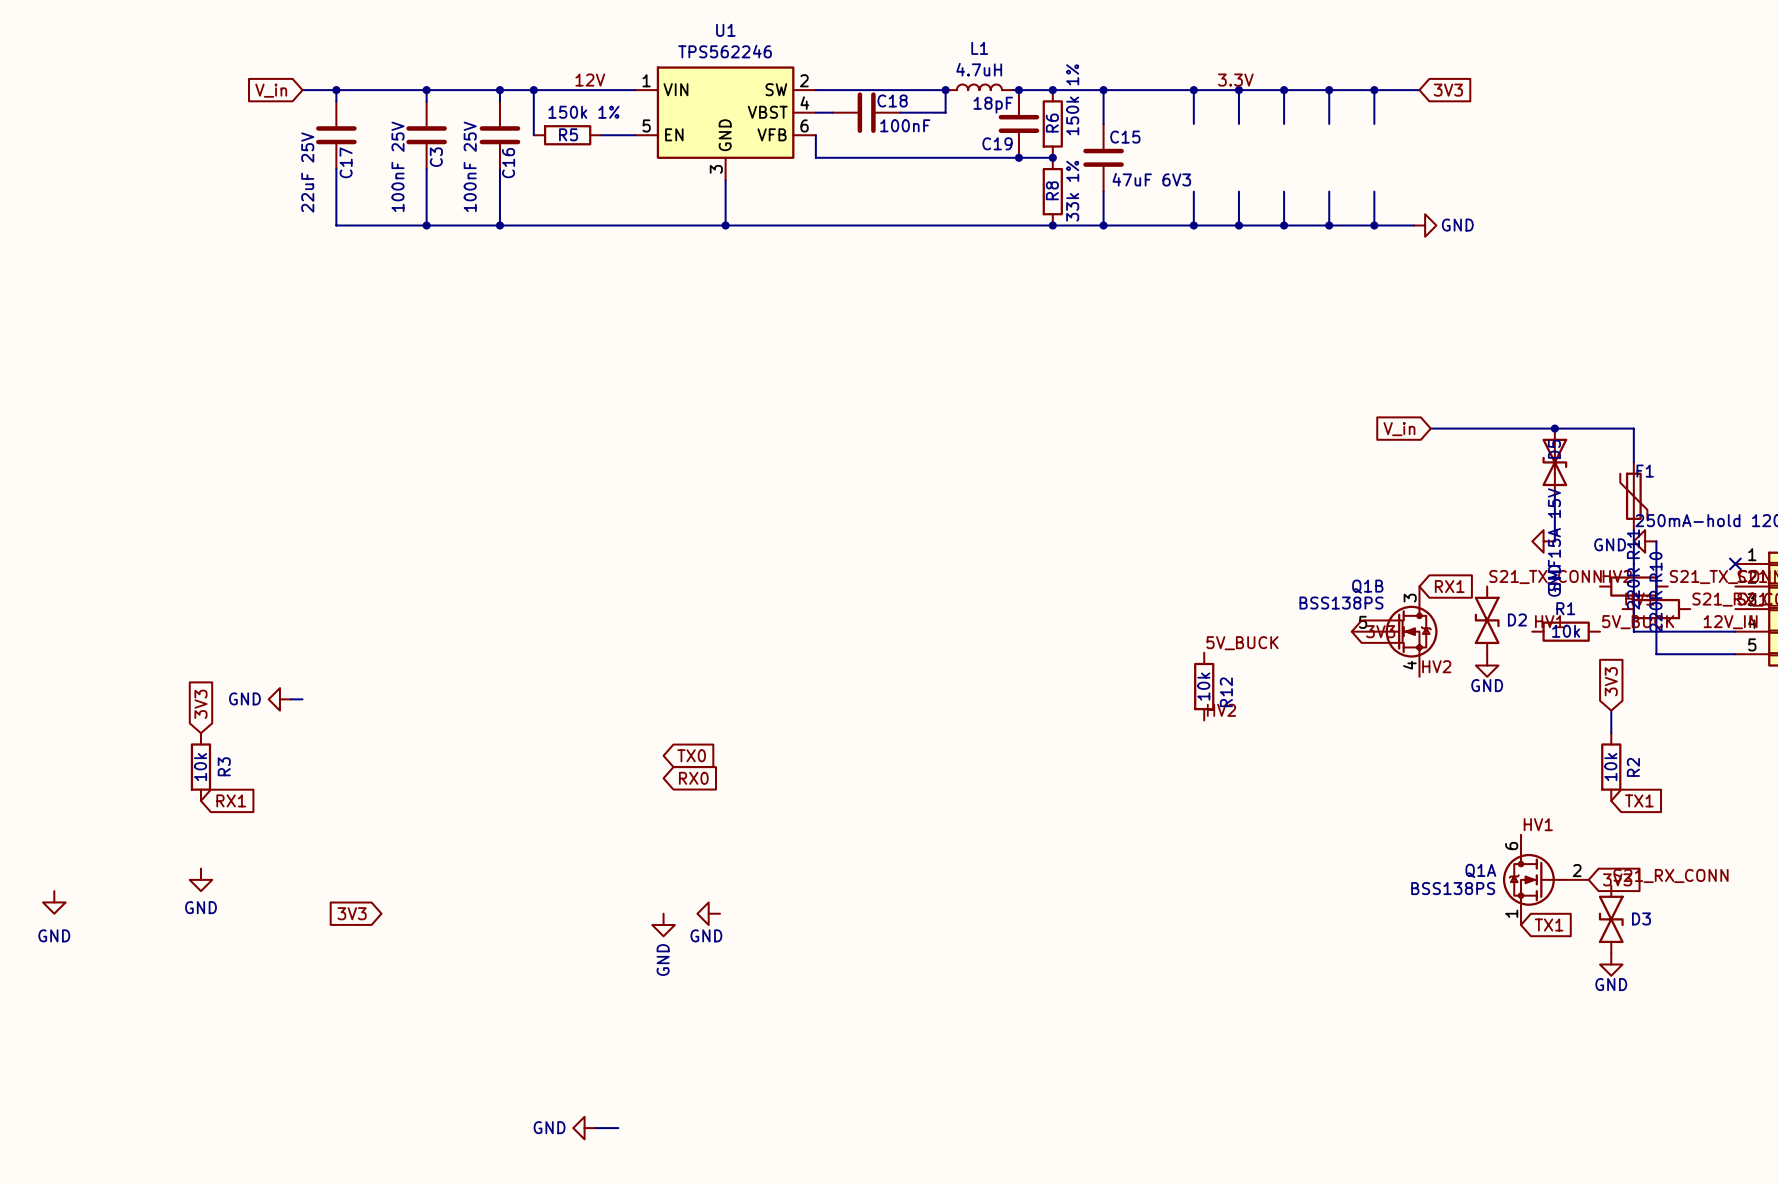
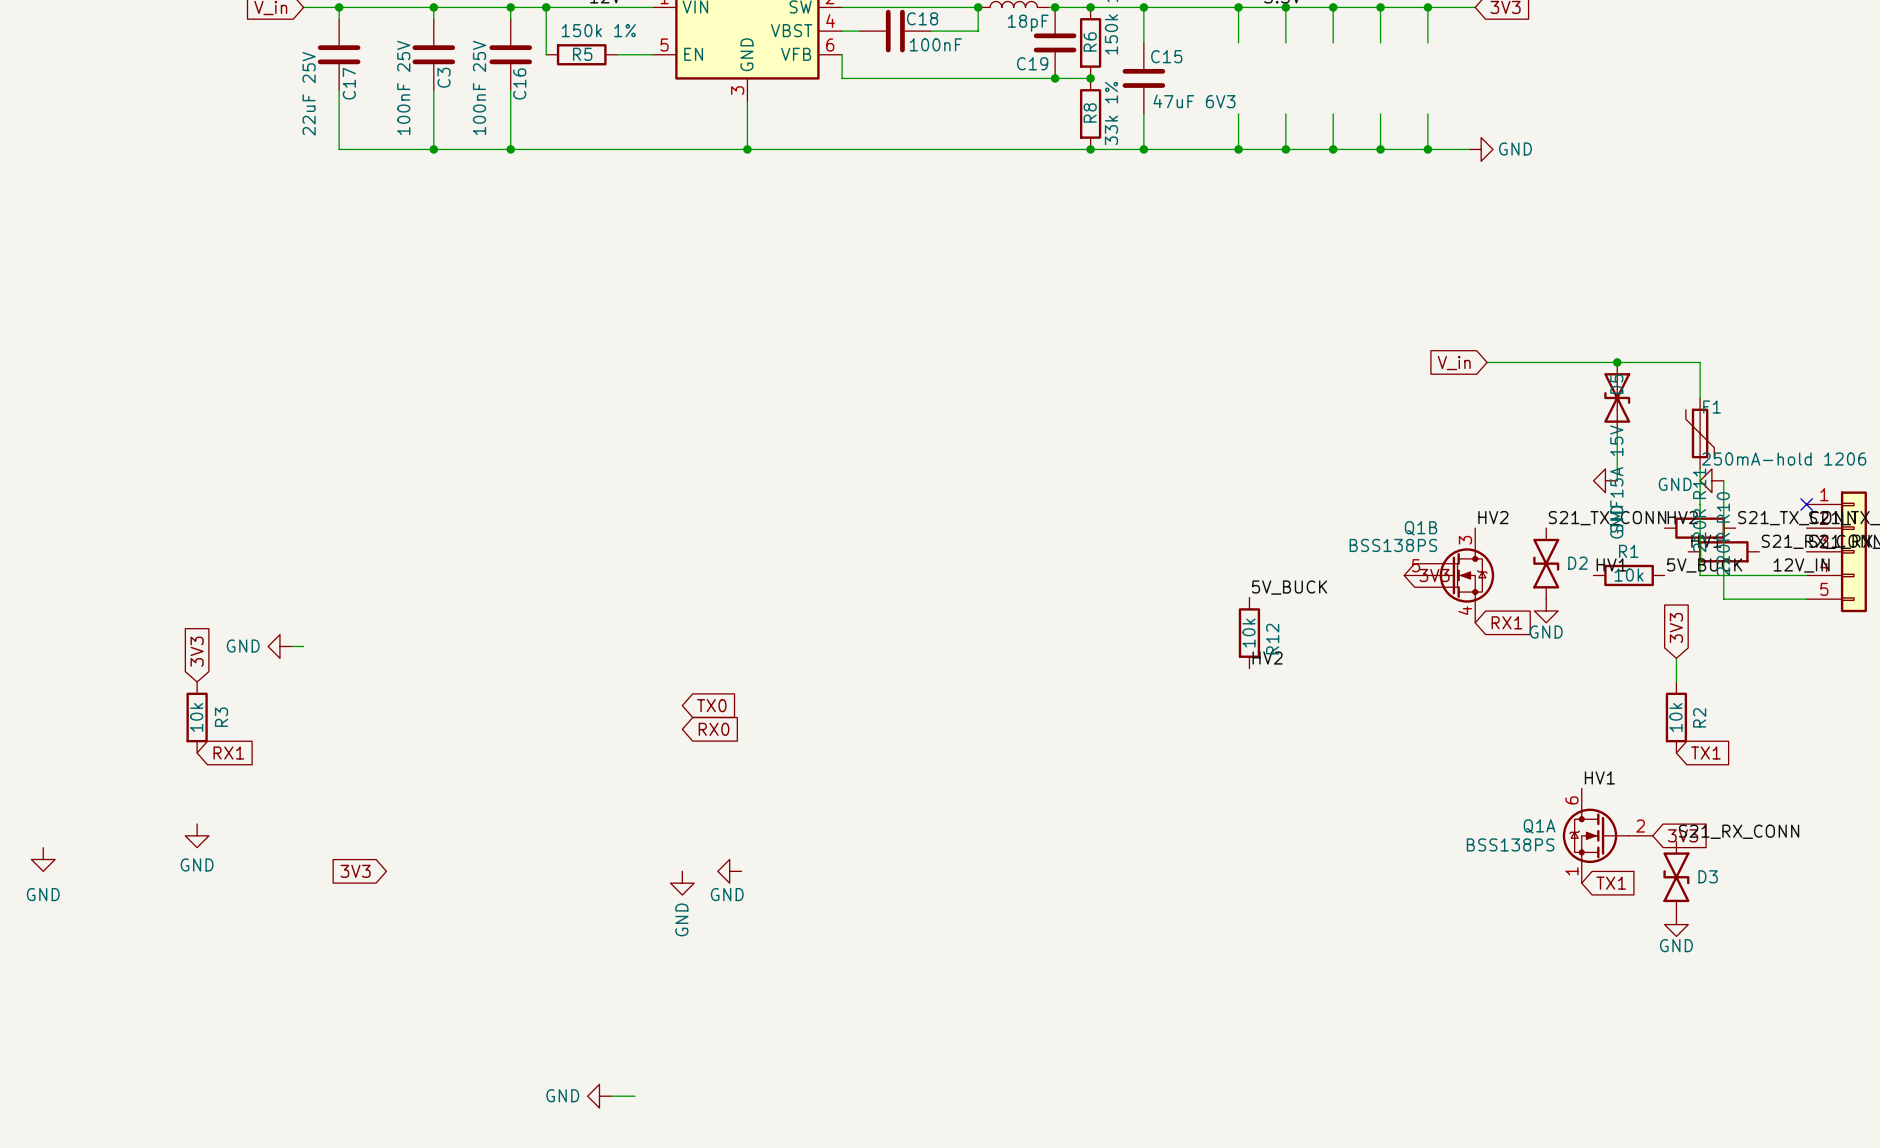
global label position: RX1 (1449, 586) -> RX1 (1506, 622)
label position: HV2 (1436, 666) -> HV2 (1493, 517)

